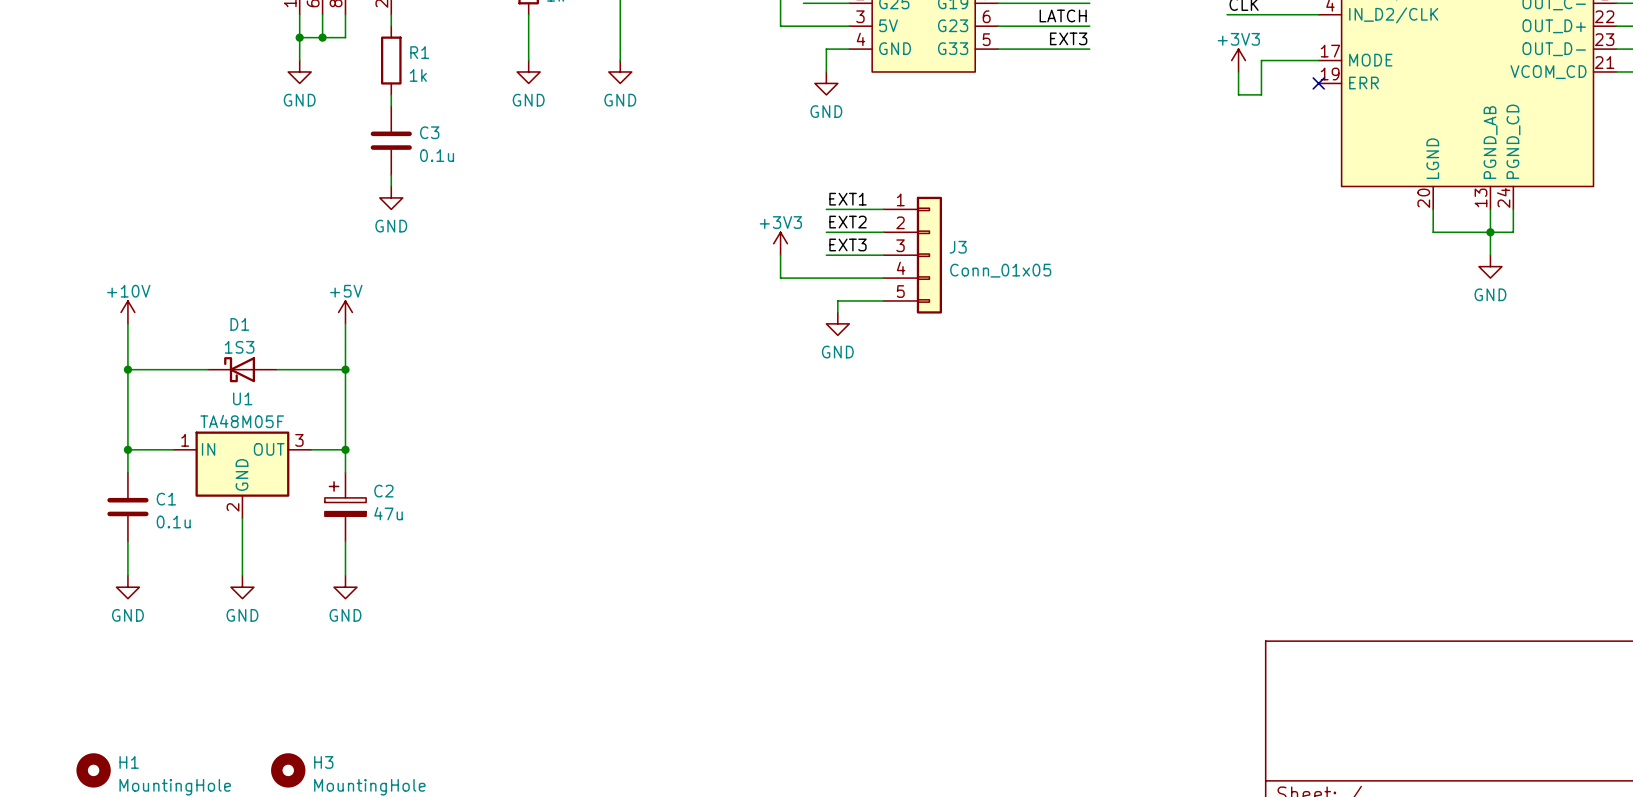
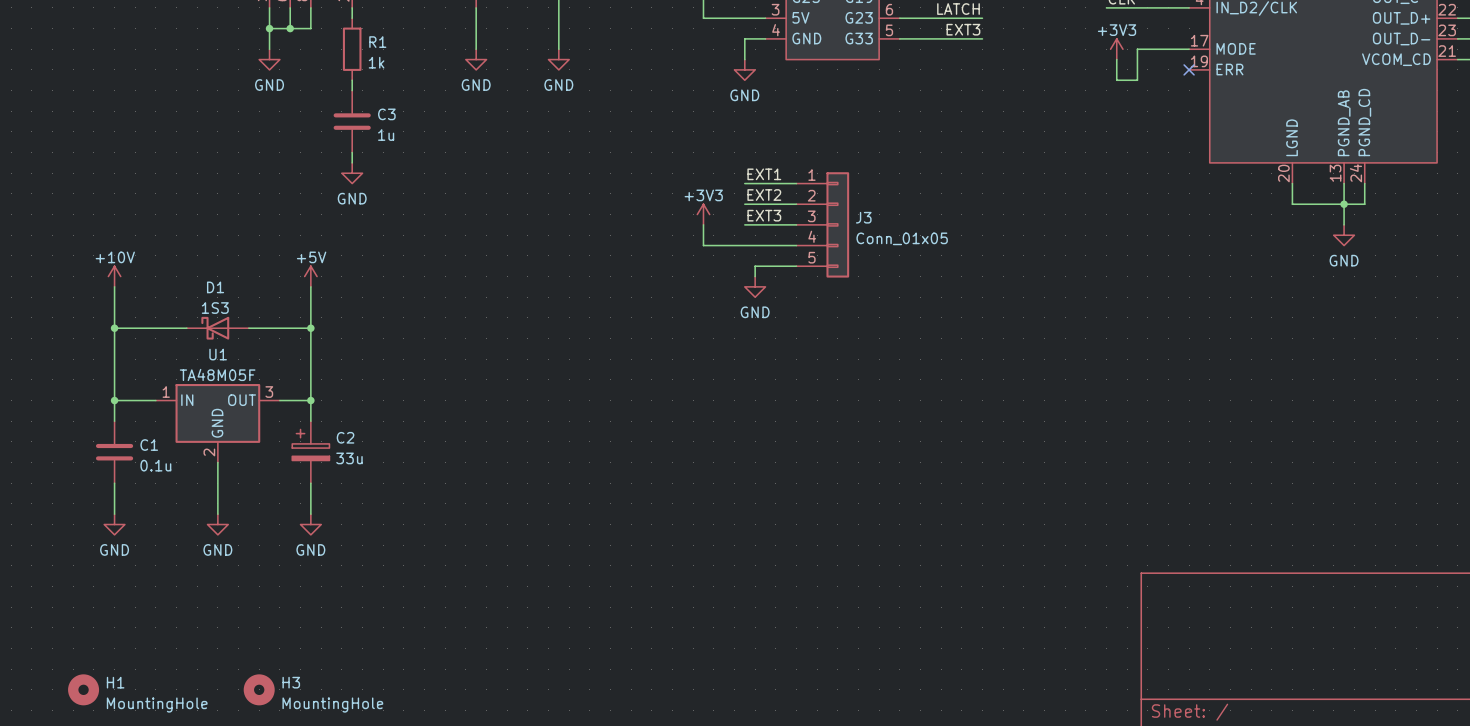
C3 value: 0.1u (437, 155) -> 1u (386, 135)
C2 value: 47u (388, 513) -> 33u (349, 458)

